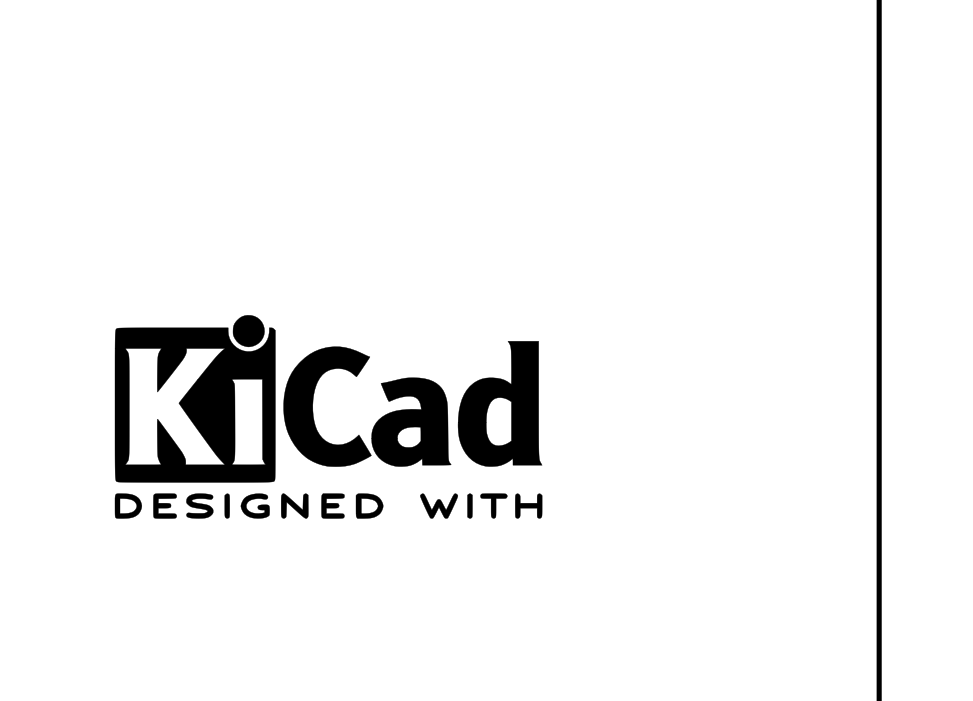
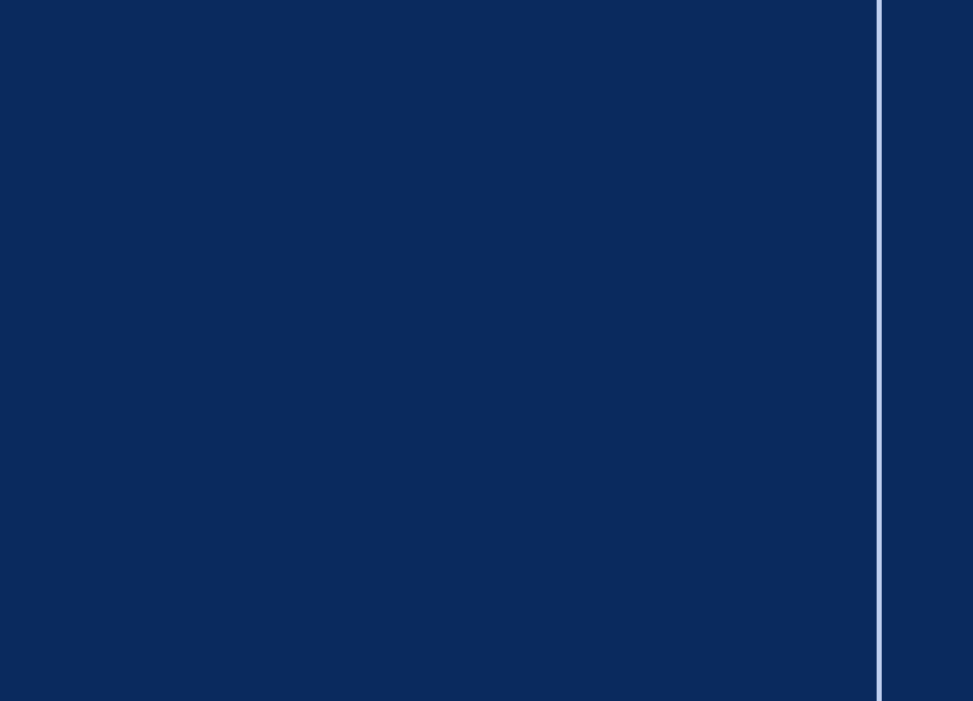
drawing: [114, 315, 543, 519] -> none

